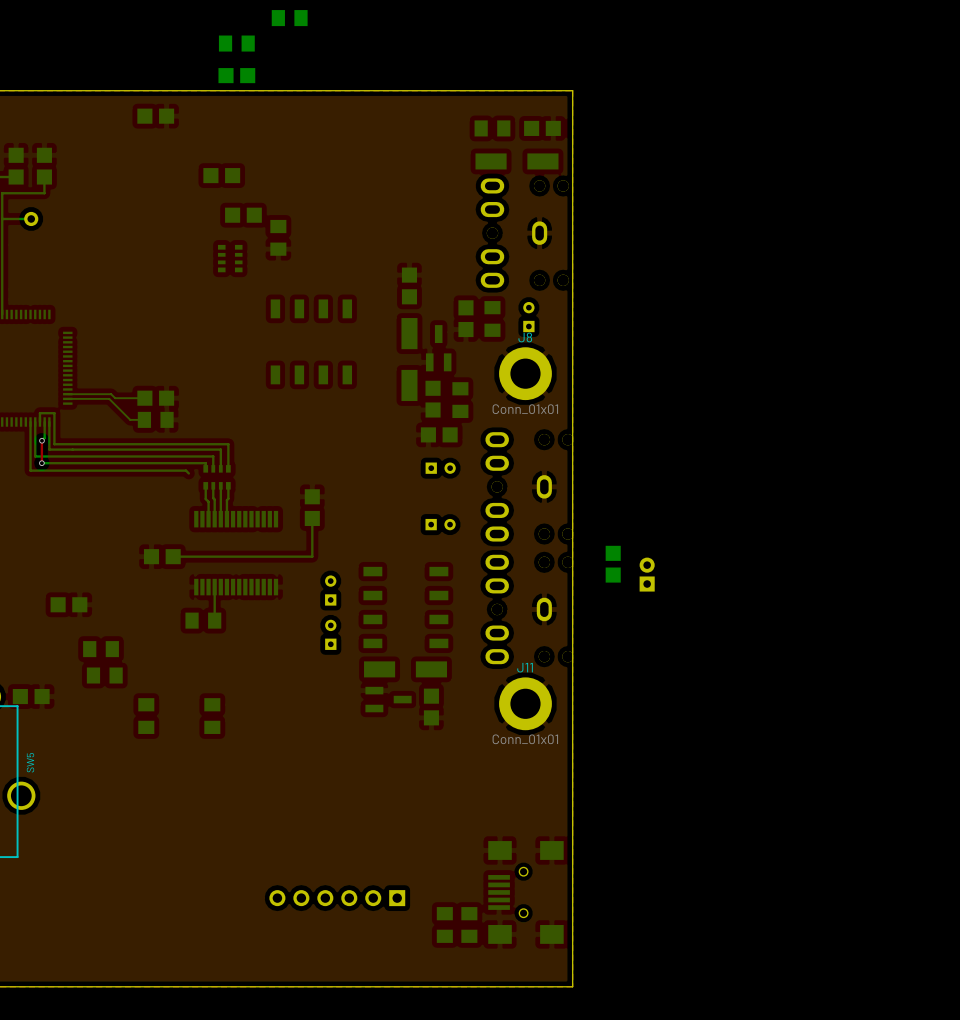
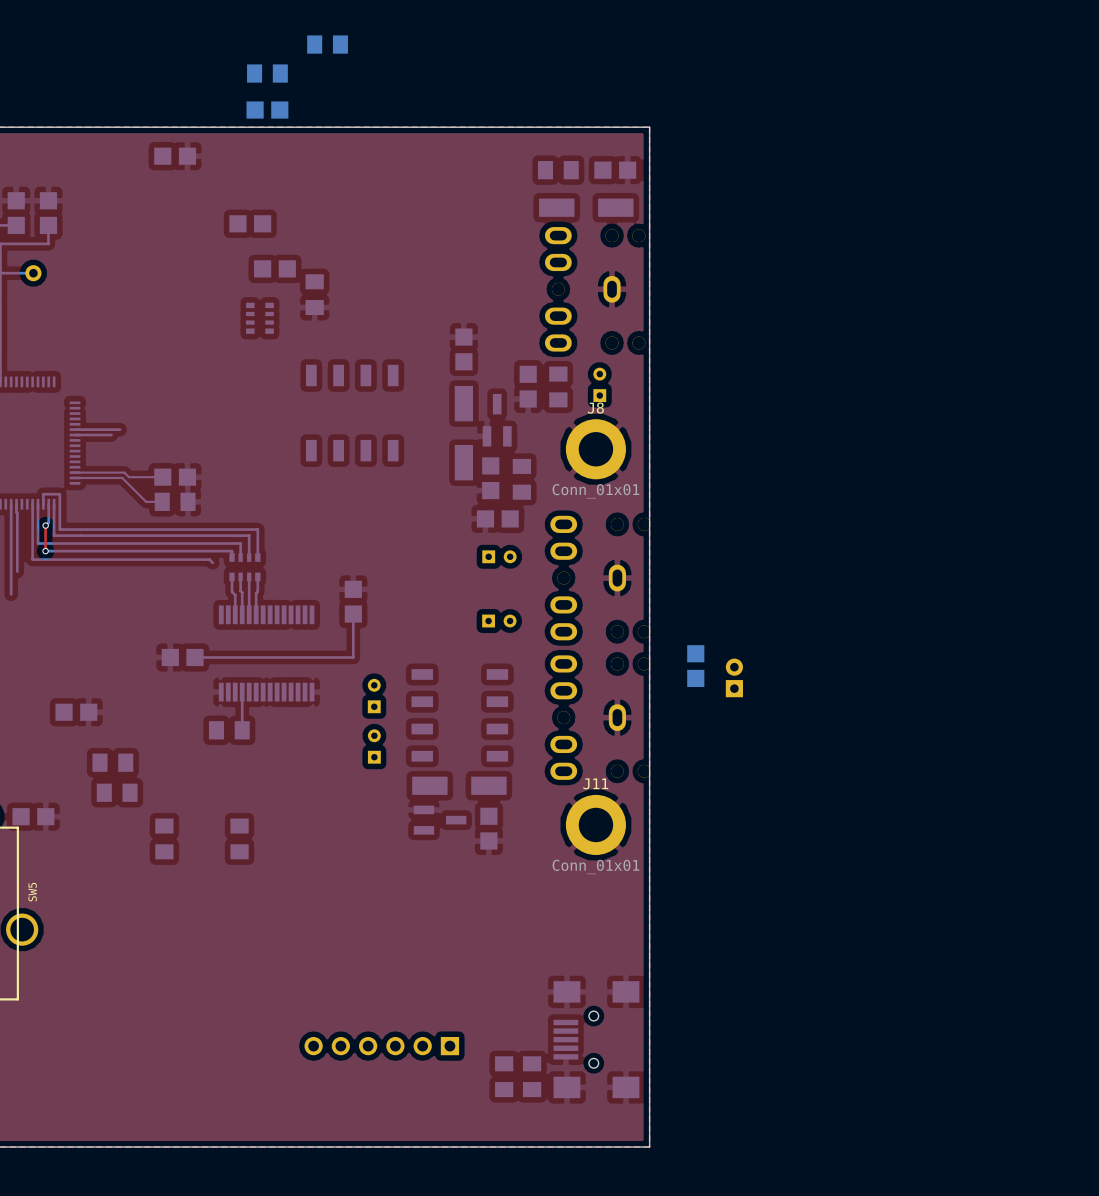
bottom track: none -> (75, 429) (120, 429)
bottom track: none -> (75, 435) (111, 435)
bottom track: none -> (11, 504) (11, 594)
bottom track: none -> (16, 504) (17, 571)

